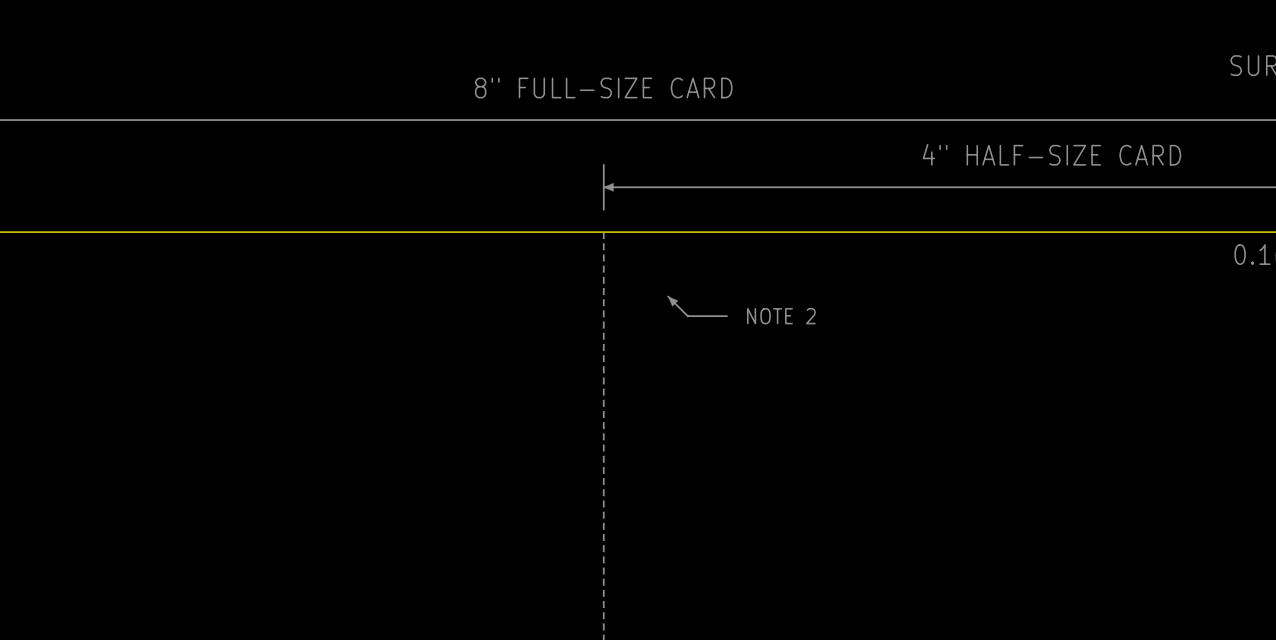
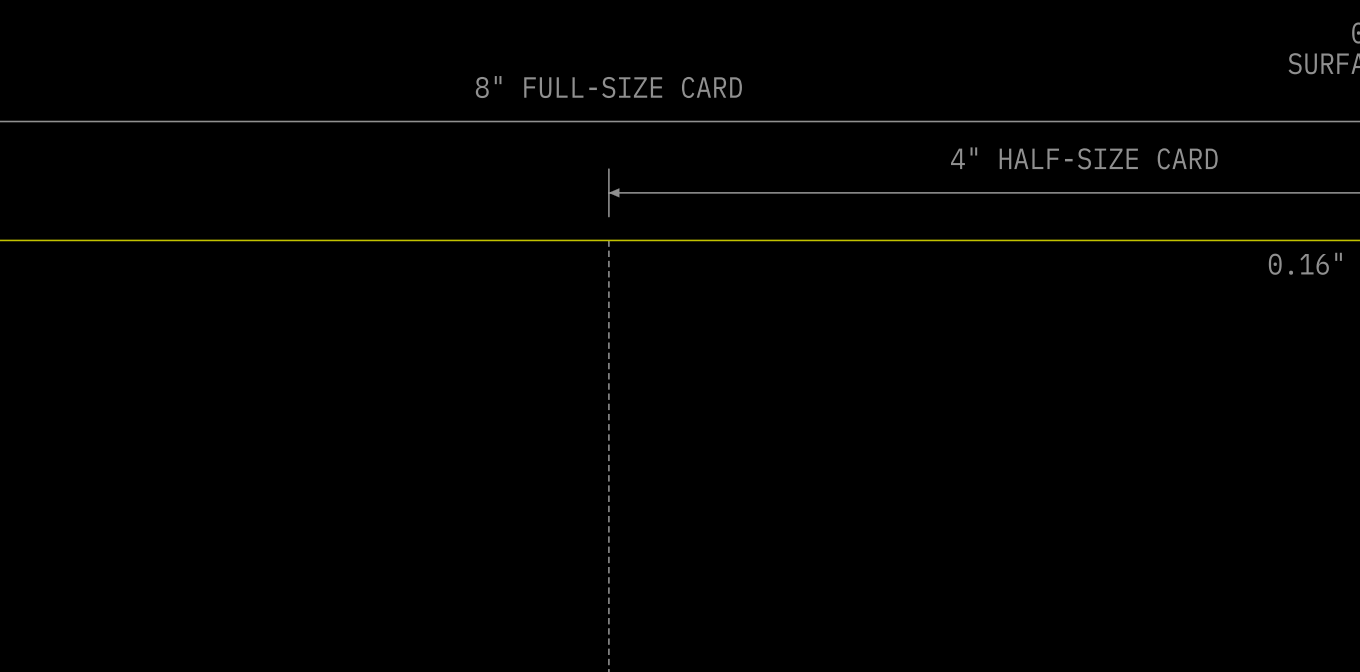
line: (668, 296) (687, 316) (727, 316) -> none
drawing: [668, 296, 679, 307] -> none
text: NOTE 2 (781, 316) -> none

